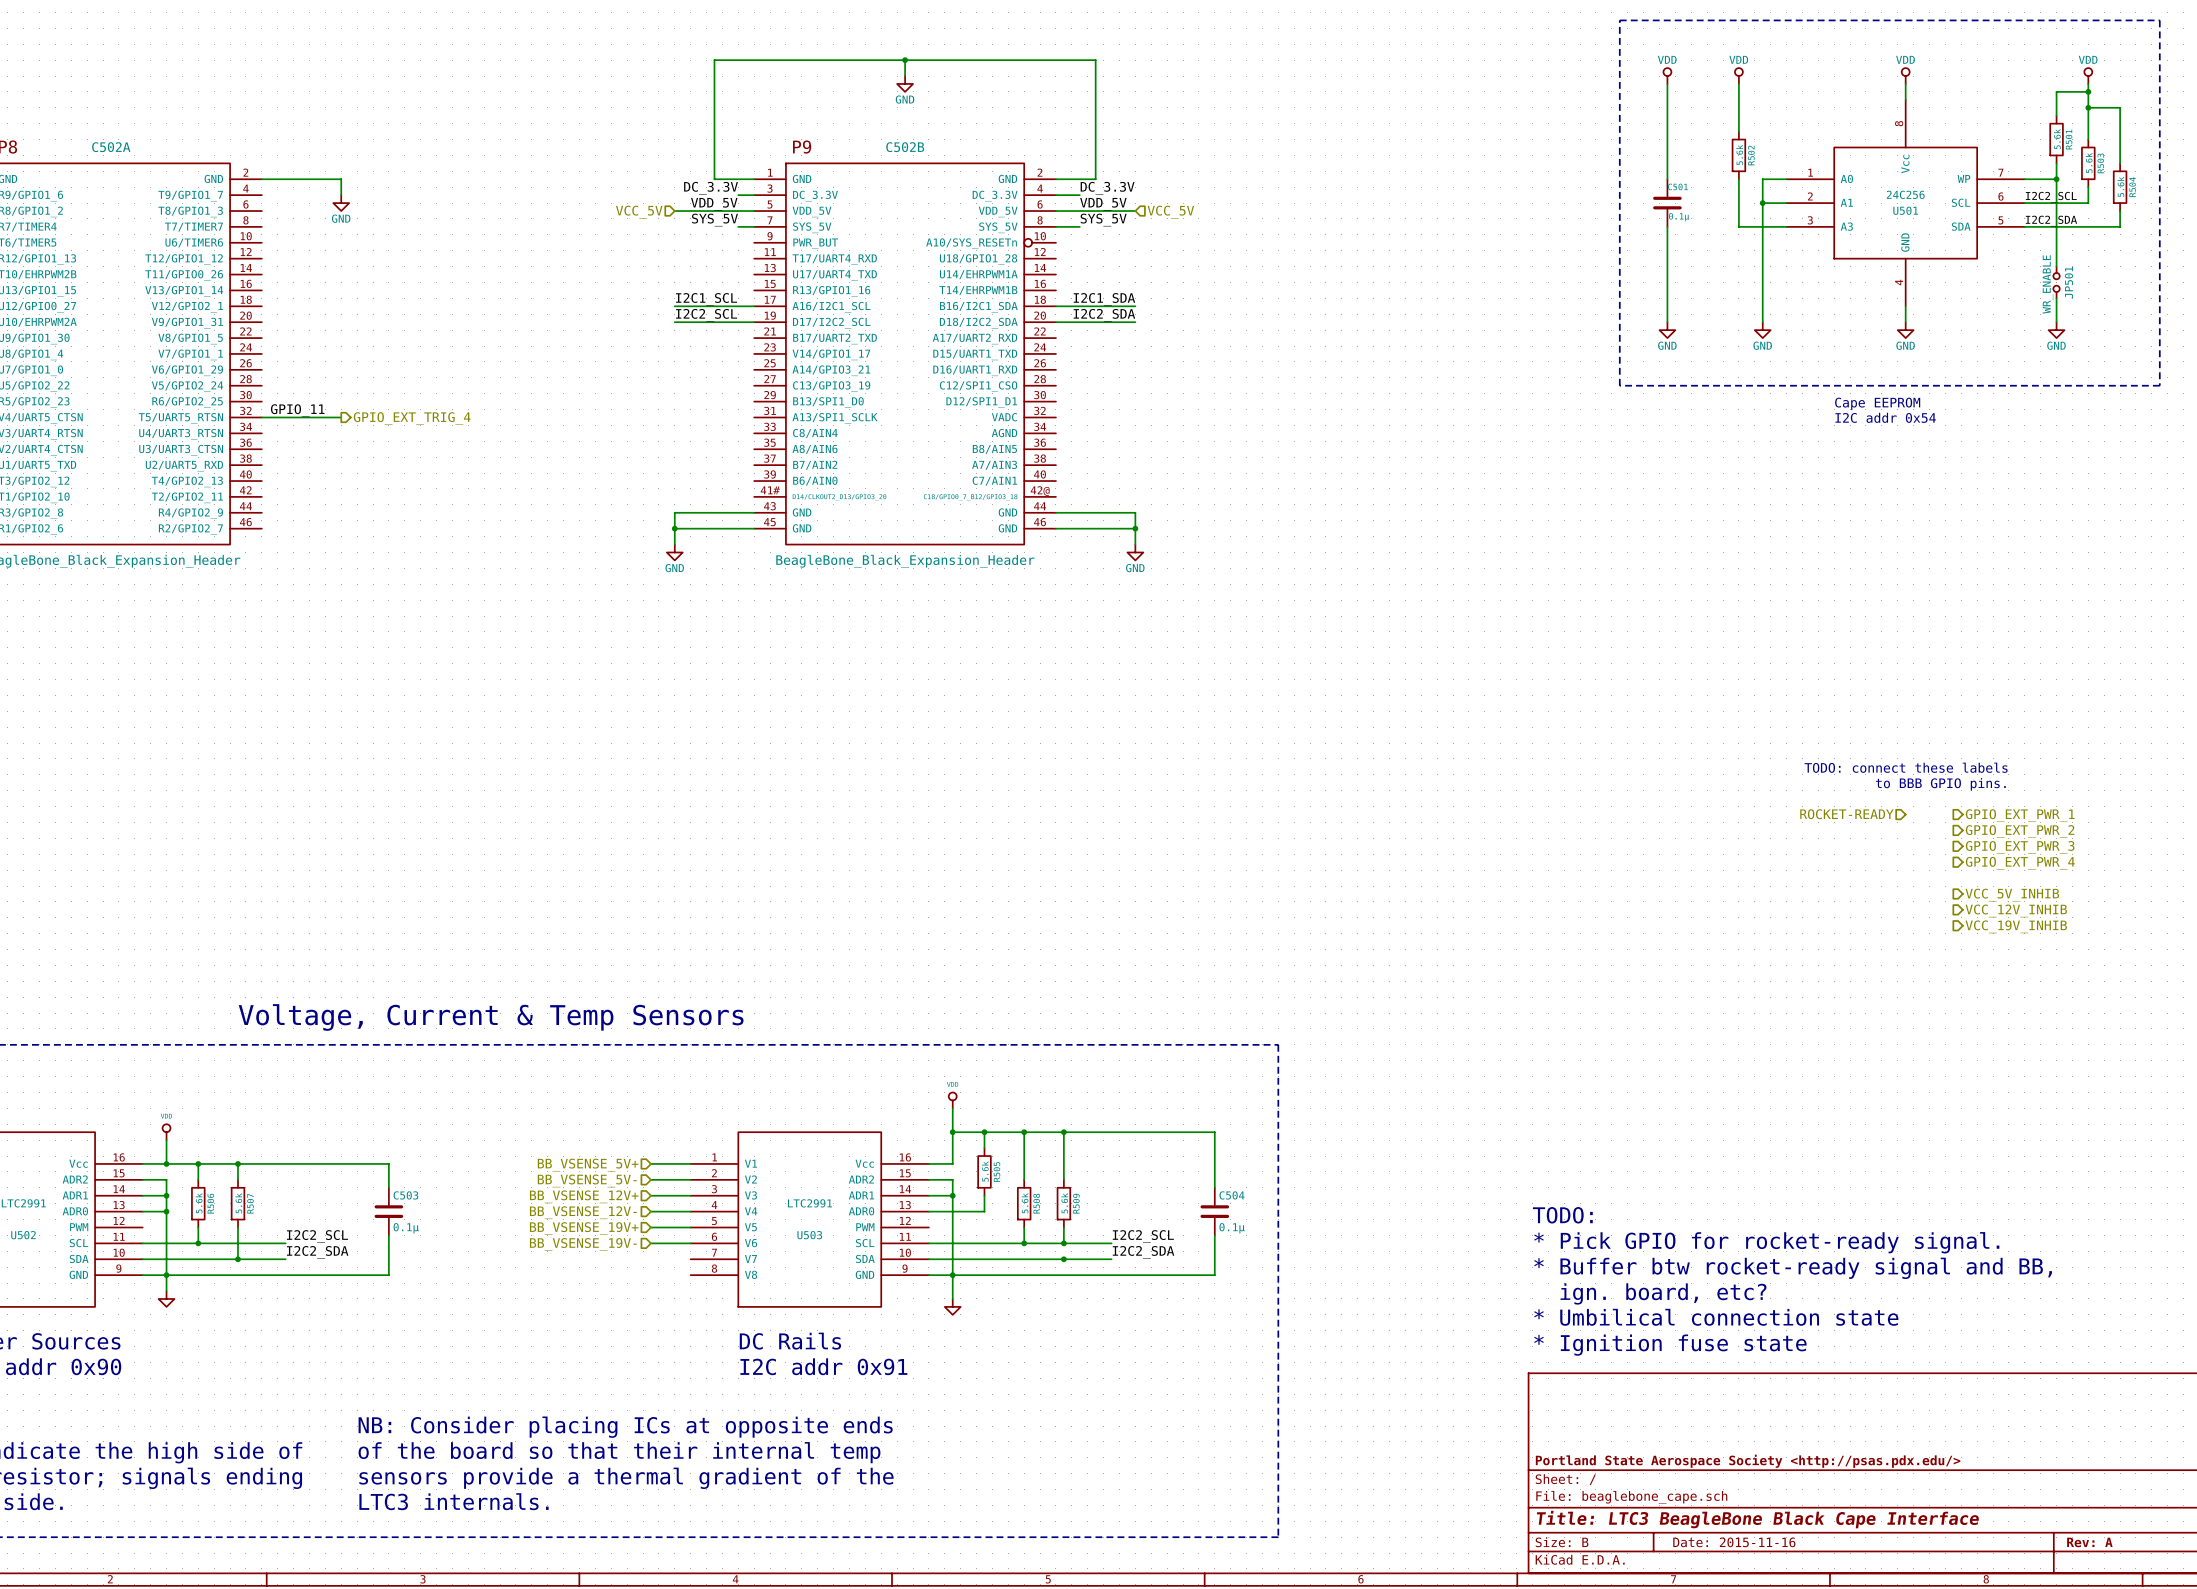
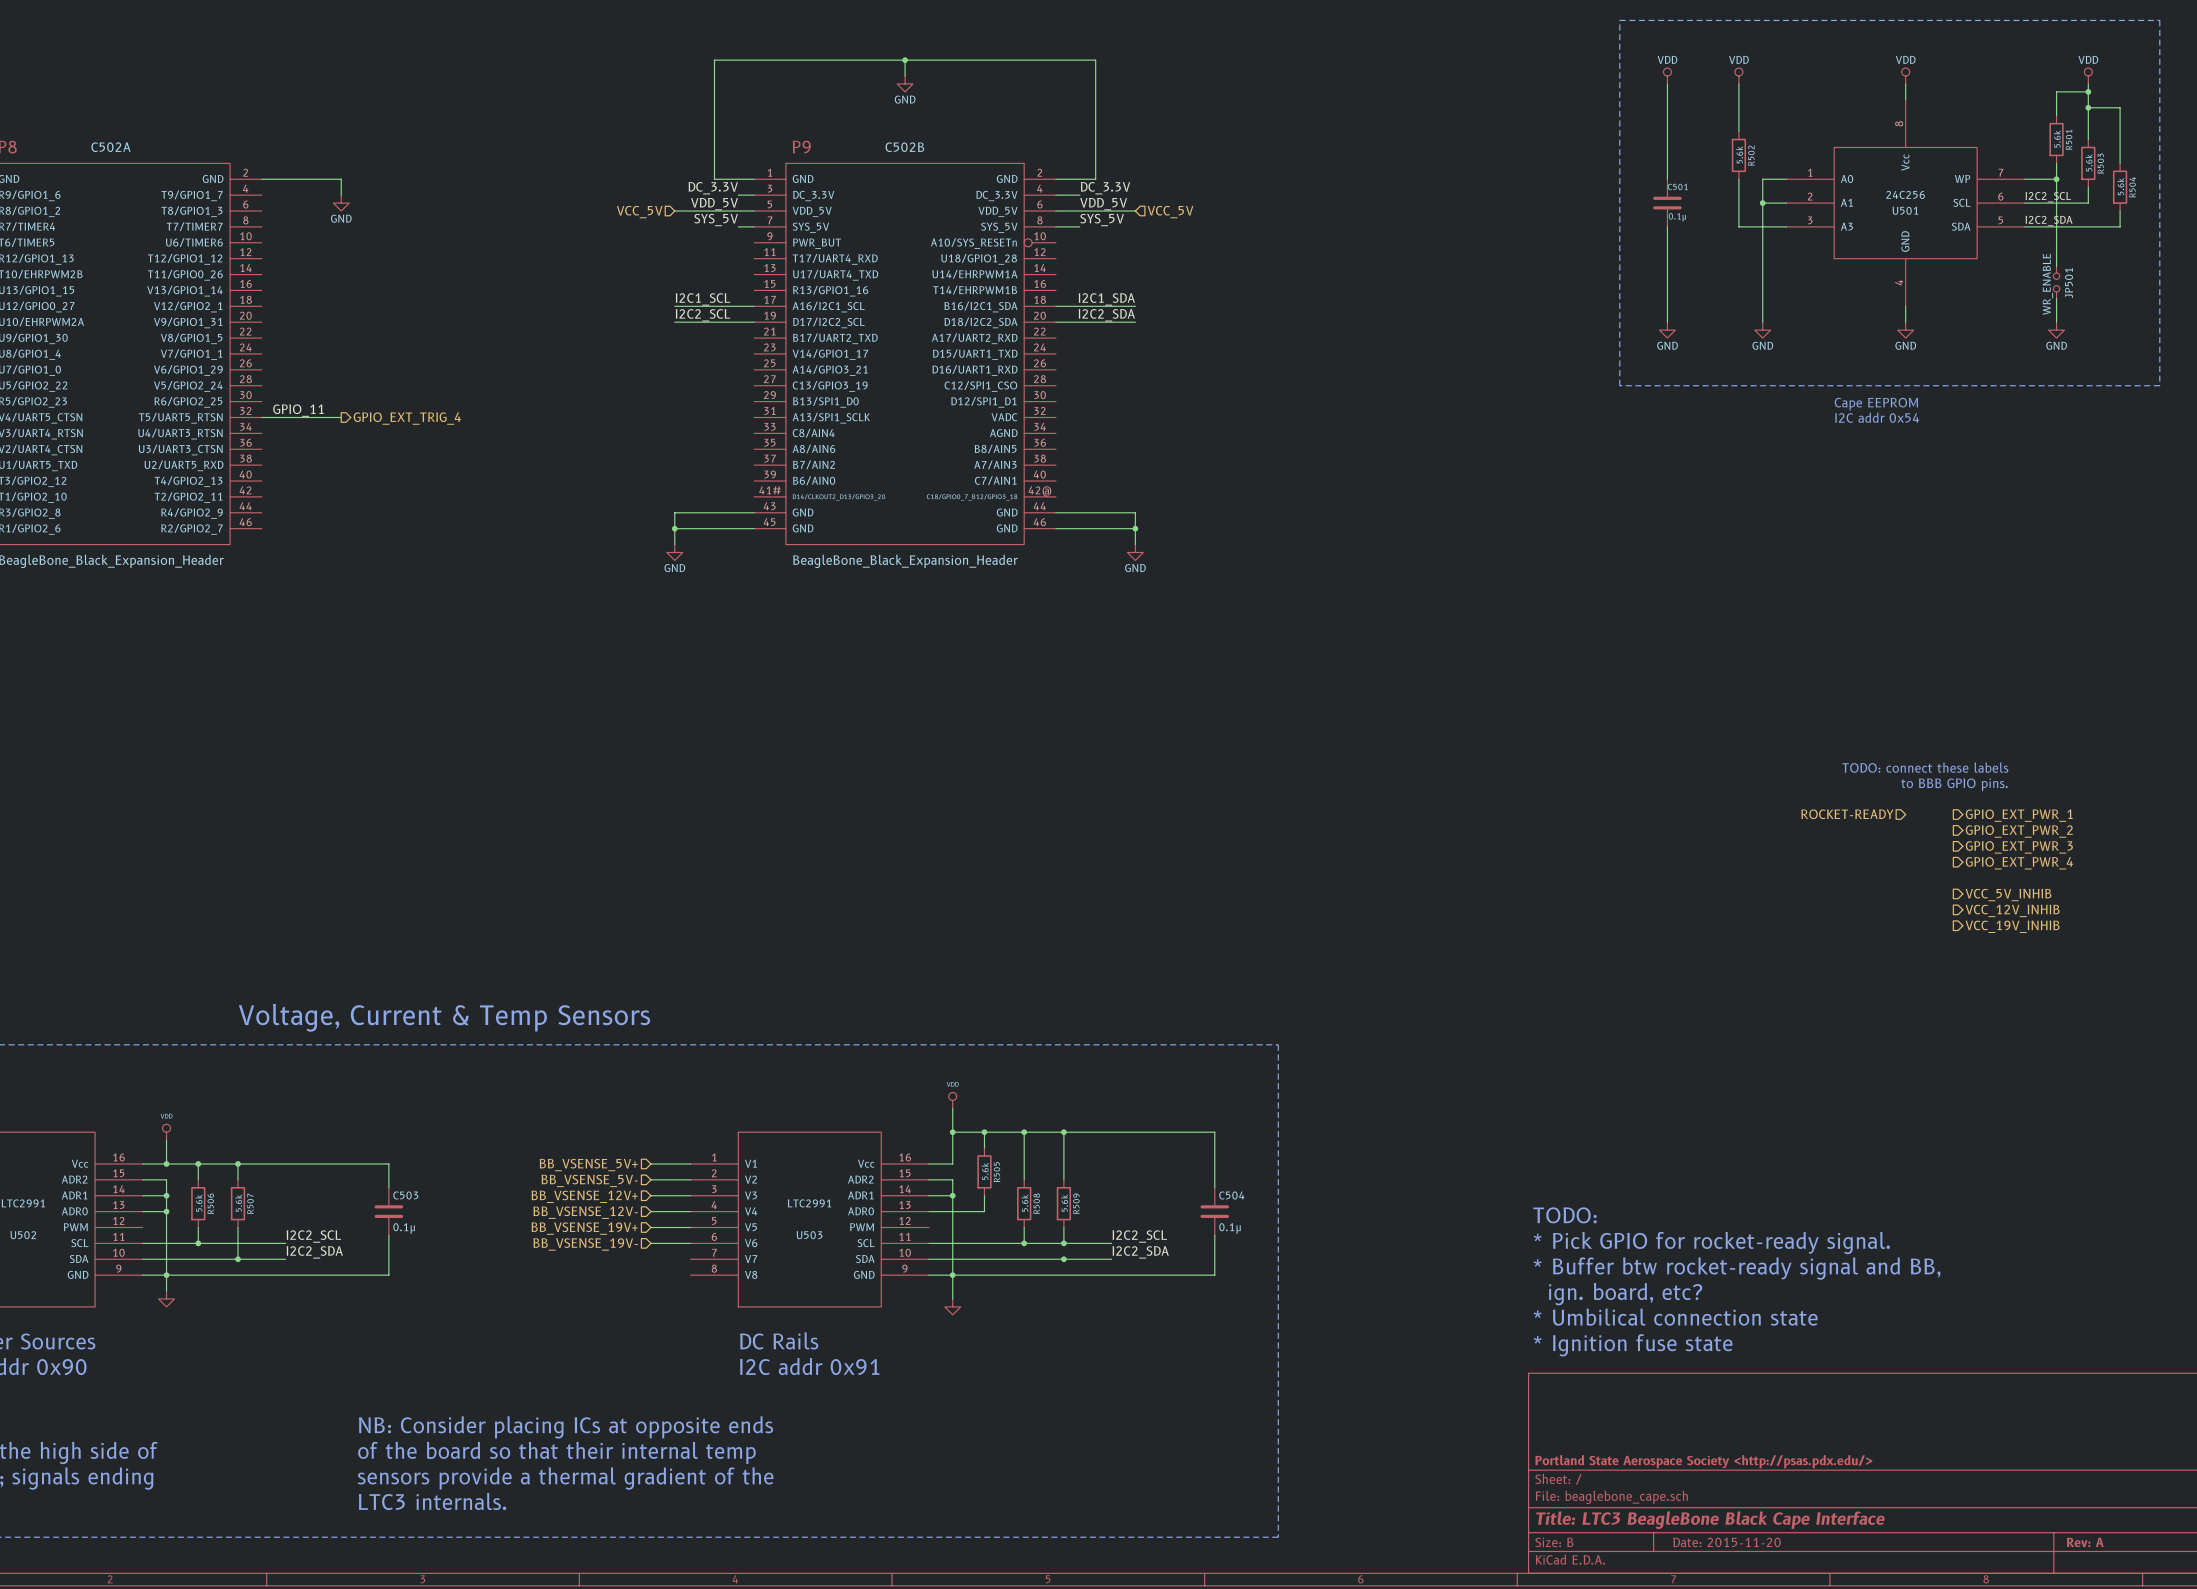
title block: Date: 2015-11-16 (1734, 1542) -> Date: 2015-11-20 (1727, 1542)

